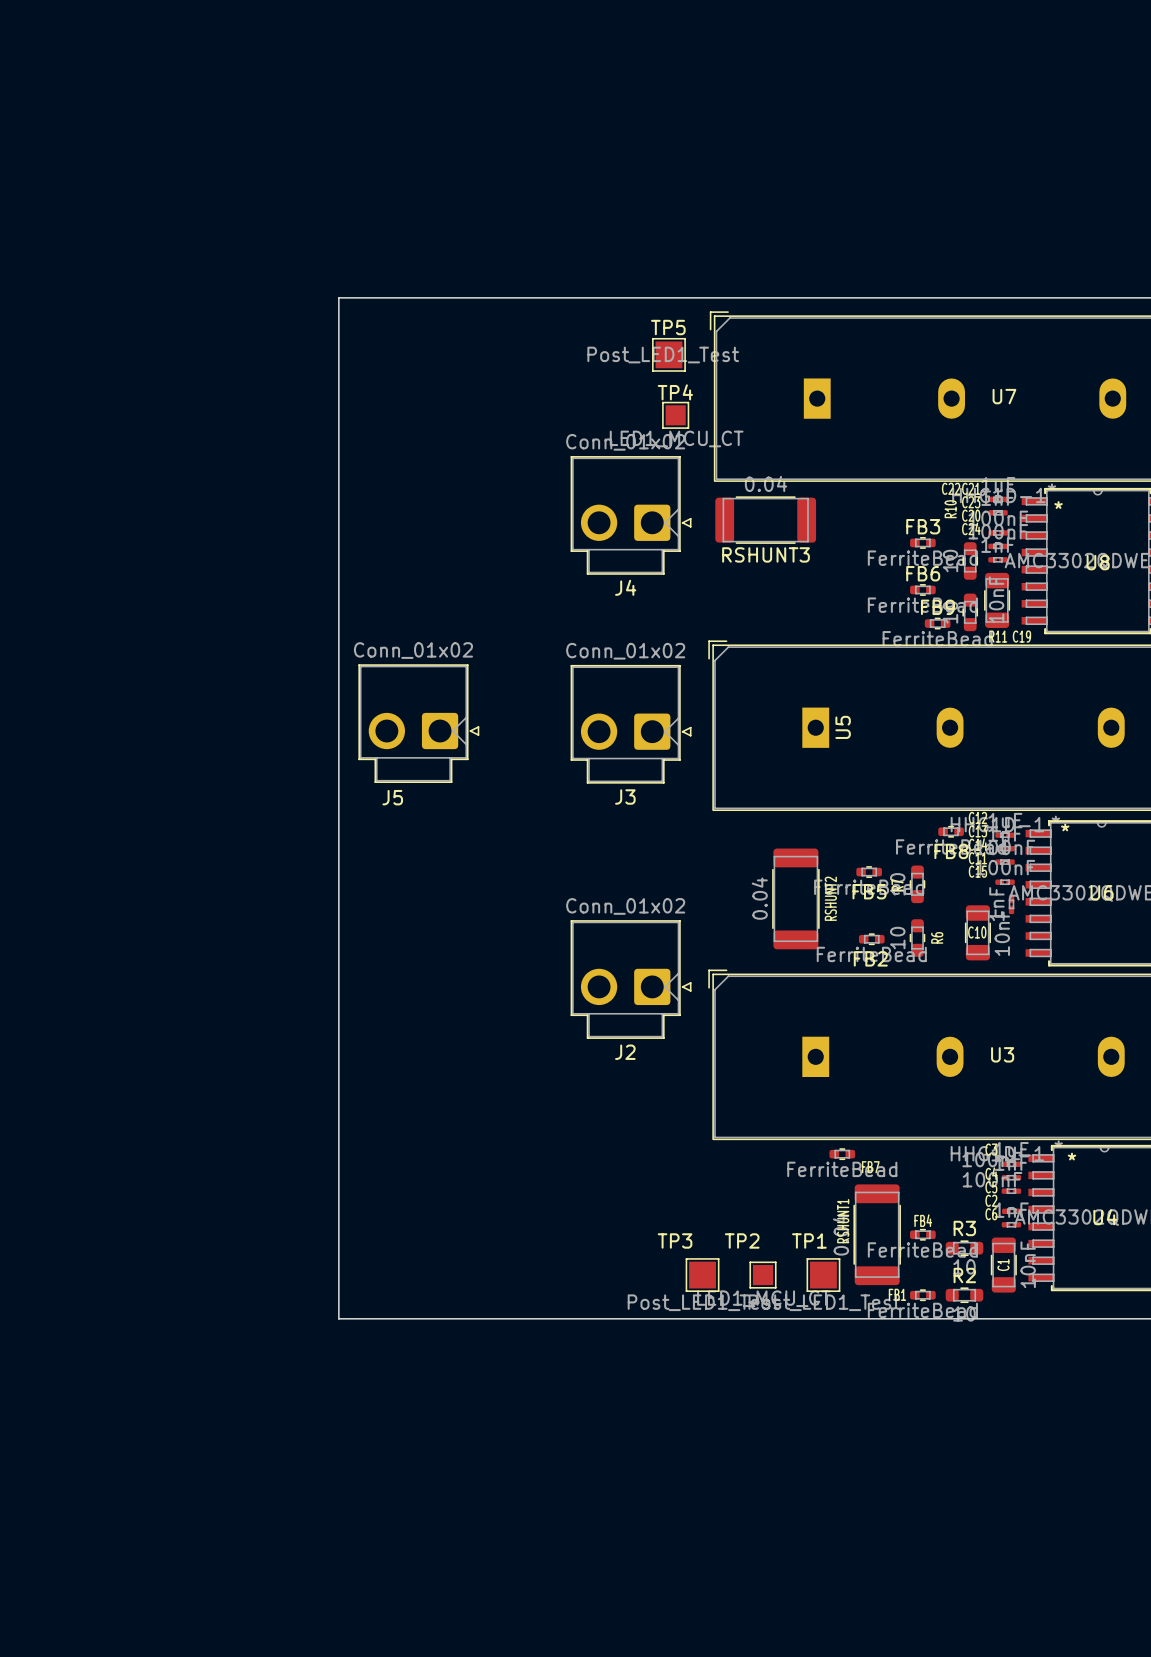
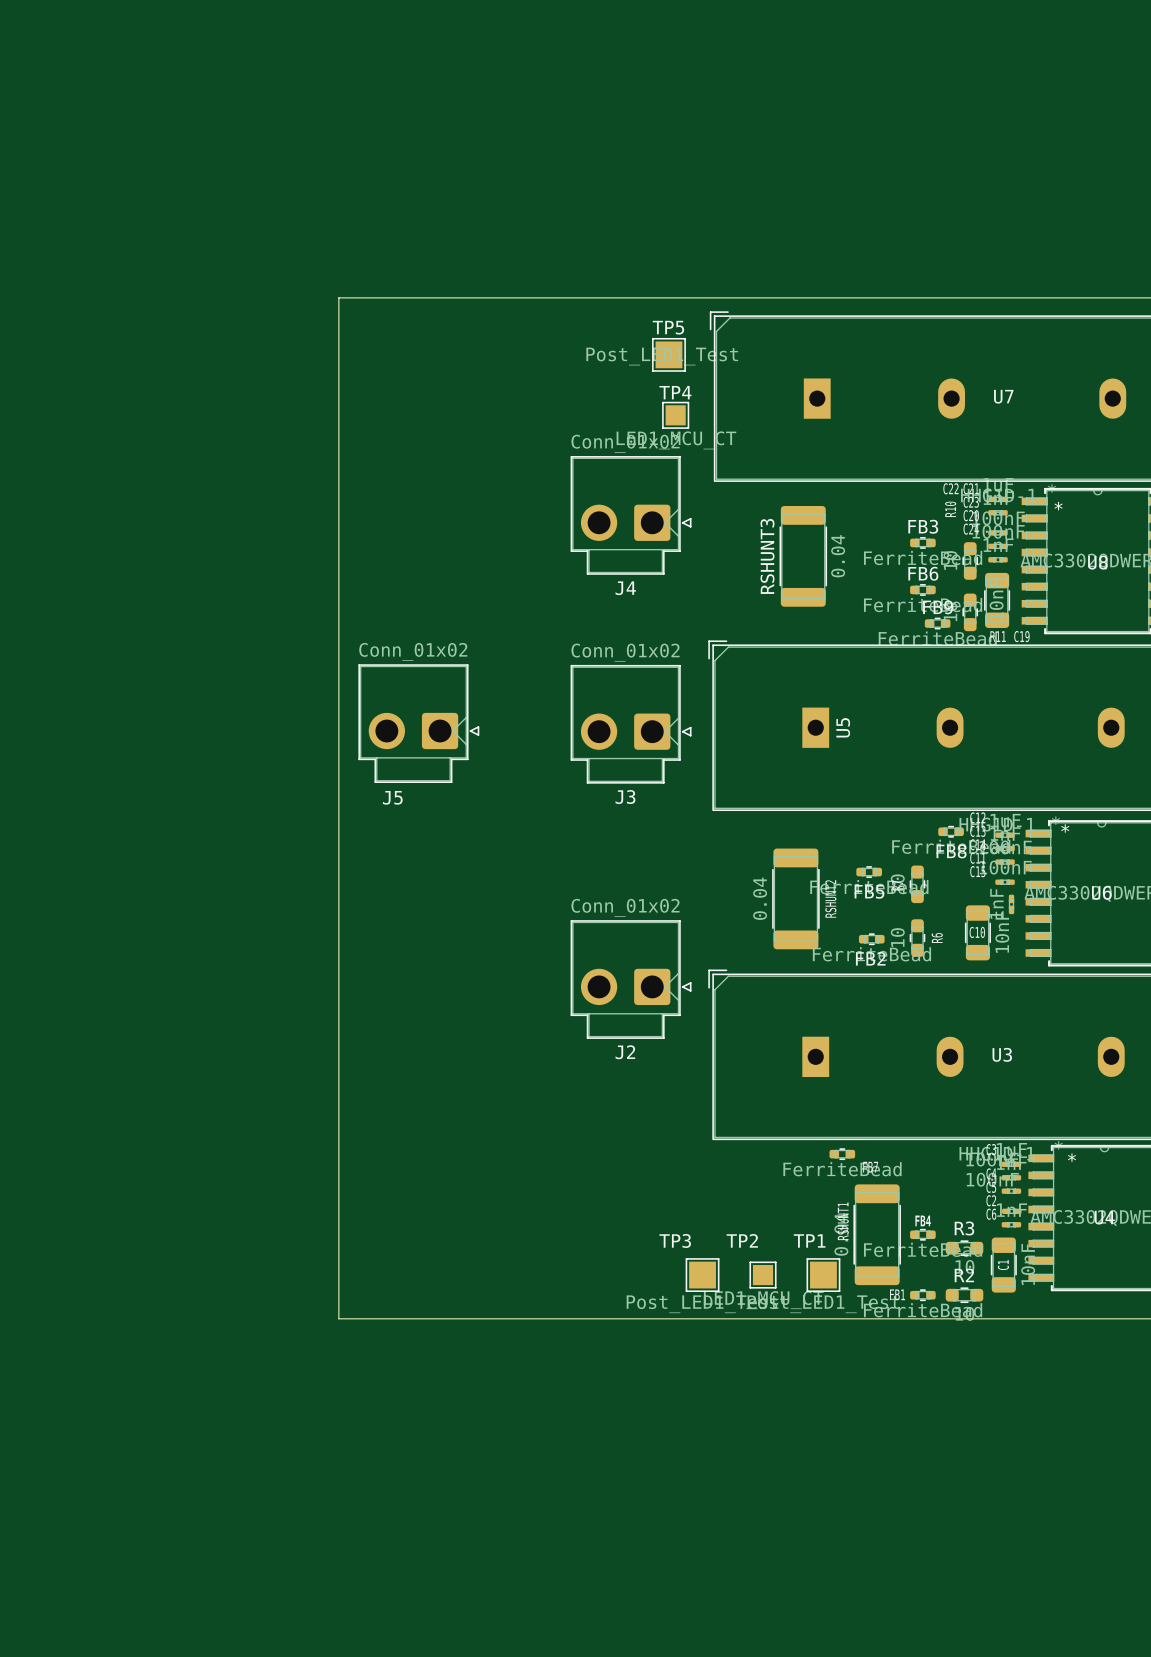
RSHUNT3 rotation: 0° (765, 520) -> 90° clockwise (803, 556)

